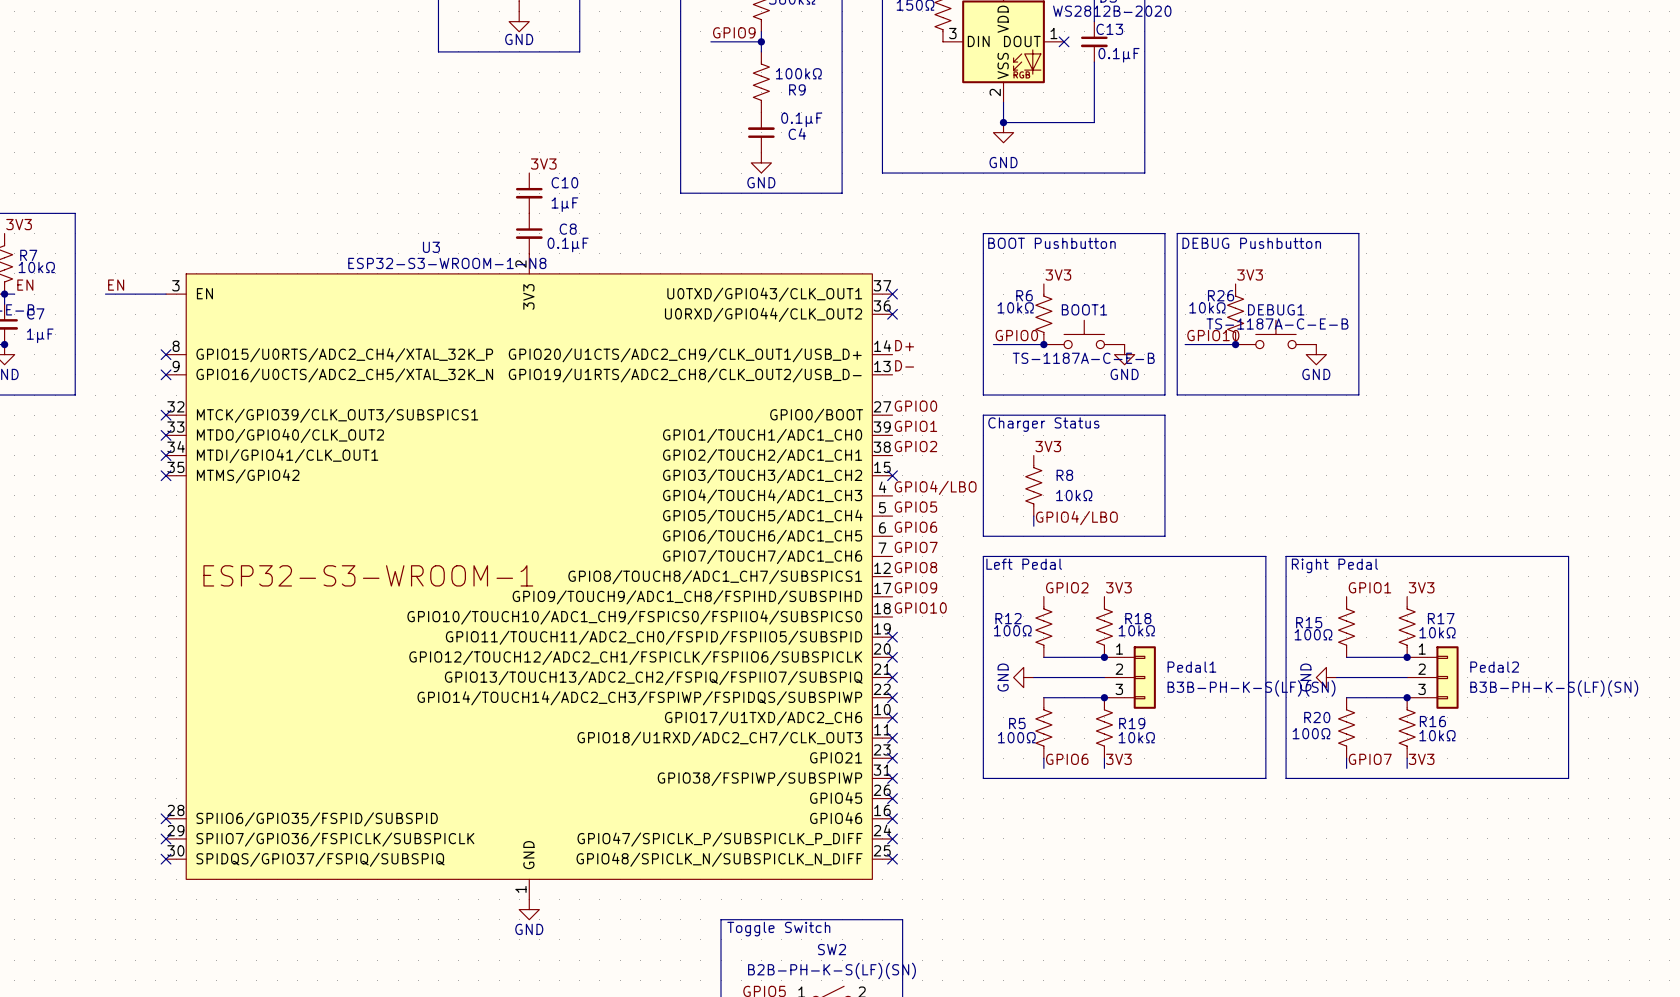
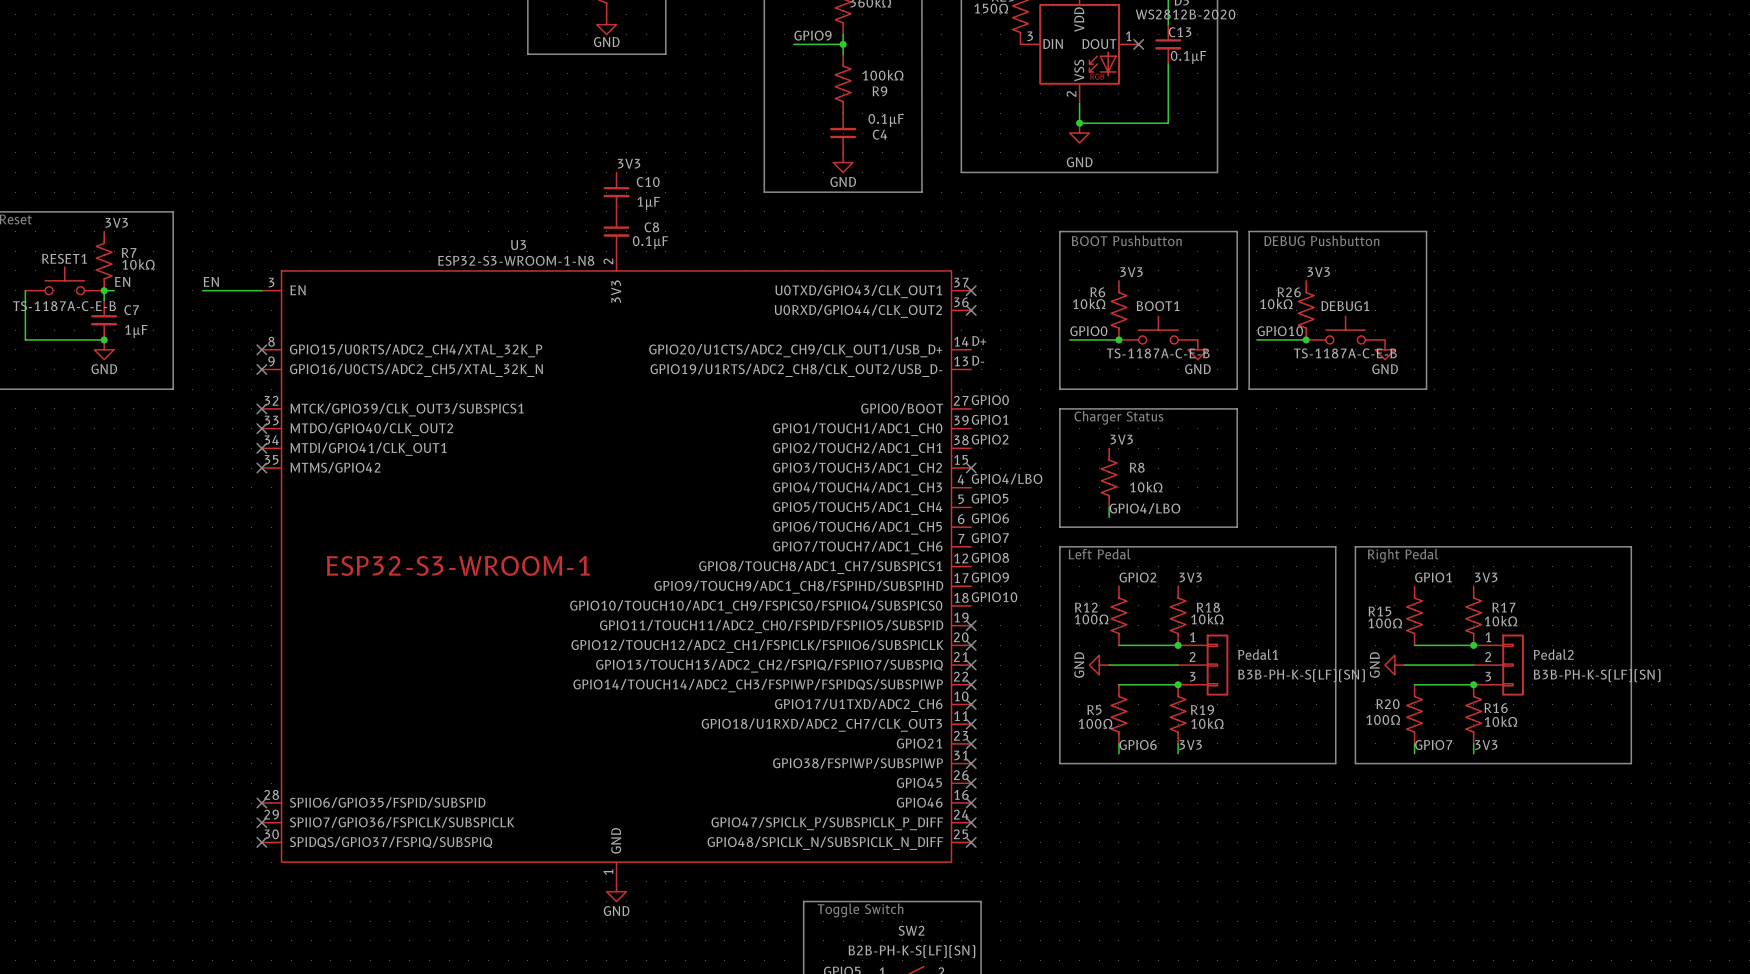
DEBUG1 value position: TS-1187A-C-E-B (1277, 323) -> TS-1187A-C-E-B (1345, 353)

